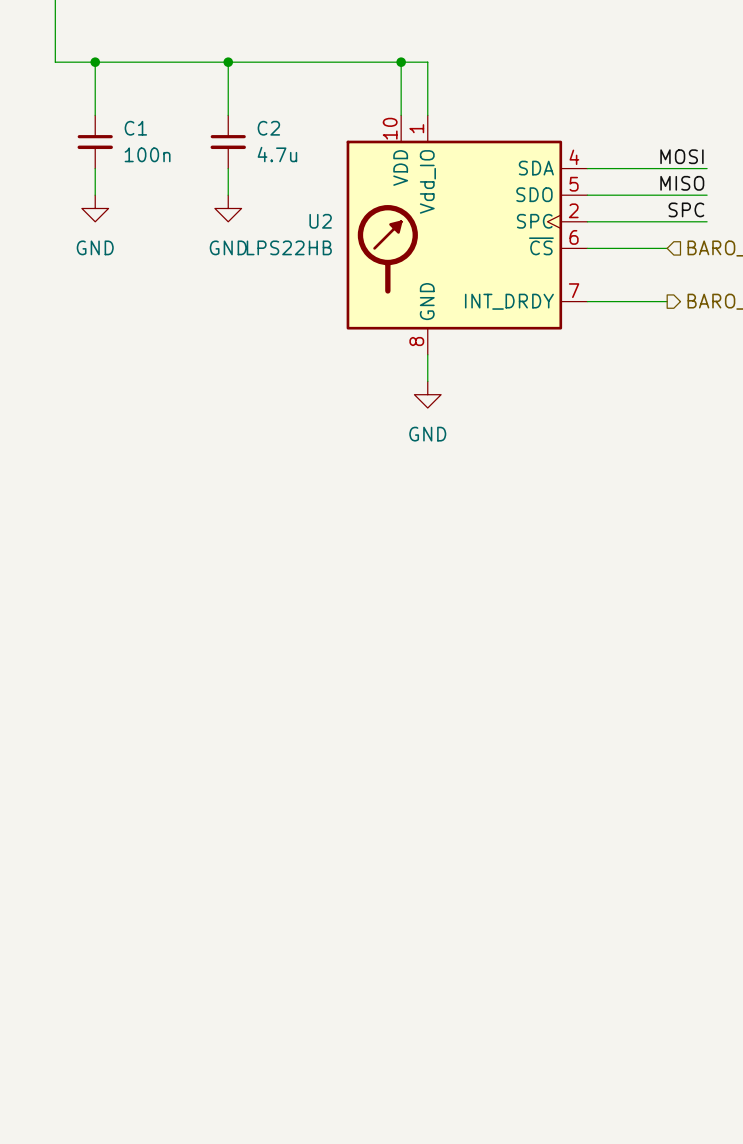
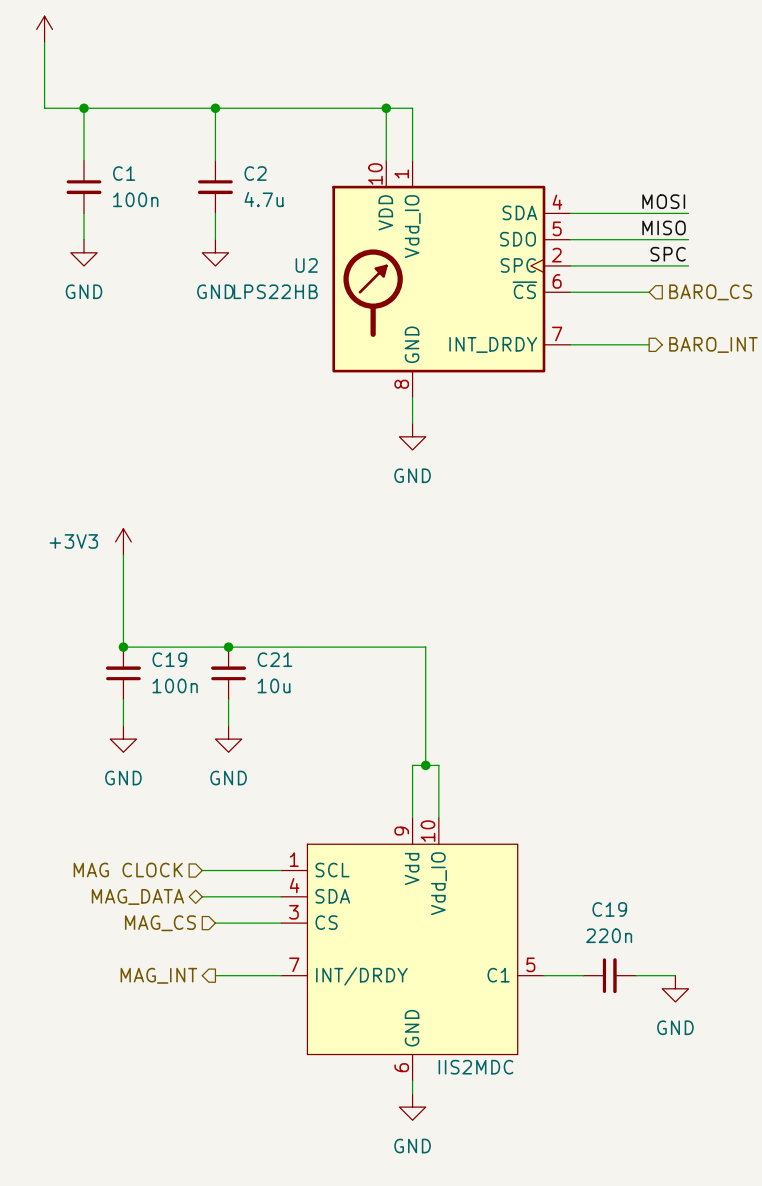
power symbol: none -> +3V3 (123, 541)
wire: none -> (123, 555) (123, 647) (425, 647) (425, 765)
junction: none -> (123, 647)
junction: none -> (228, 647)
C19: none -> 100n (123, 673)
C21: none -> 10u (228, 673)
wire: none -> (123, 699) (123, 725)
wire: none -> (228, 699) (228, 725)
power symbol: none -> GND (123, 739)
power symbol: none -> GND (228, 739)
junction: none -> (425, 765)
wire: none -> (412, 817) (412, 765) (438, 765) (438, 817)
hierarchical label: none -> MAG CLOCK (128, 870)
wire: none -> (202, 870) (281, 870)
hierarchical label: none -> MAG_DATA (137, 896)
wire: none -> (202, 896) (281, 896)
hierarchical label: none -> MAG_CS (160, 923)
wire: none -> (215, 923) (281, 923)
part: none -> IIS2MDC (412, 949)
hierarchical label: none -> MAG_INT (158, 975)
wire: none -> (215, 975) (281, 975)
wire: none -> (543, 975) (583, 975)
C19: none -> 220n (609, 975)
wire: none -> (635, 975) (675, 975)
power symbol: none -> GND (675, 988)
wire: none -> (412, 1080) (412, 1093)
power symbol: none -> GND (412, 1107)

